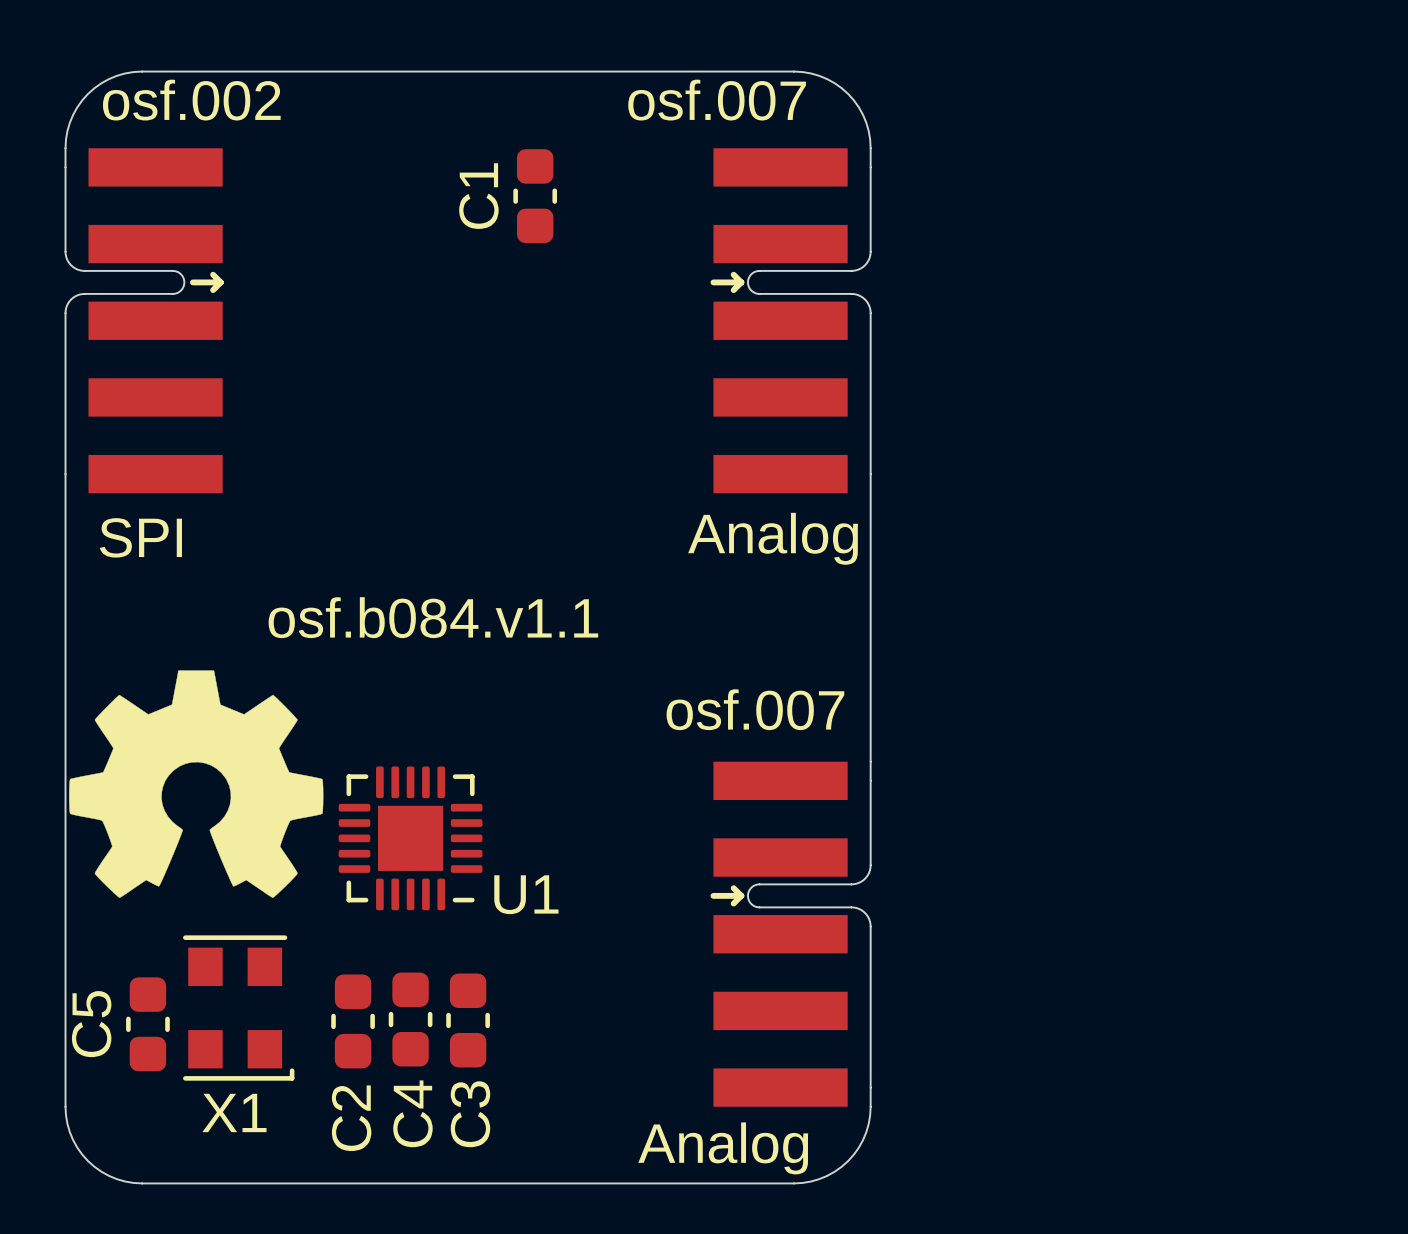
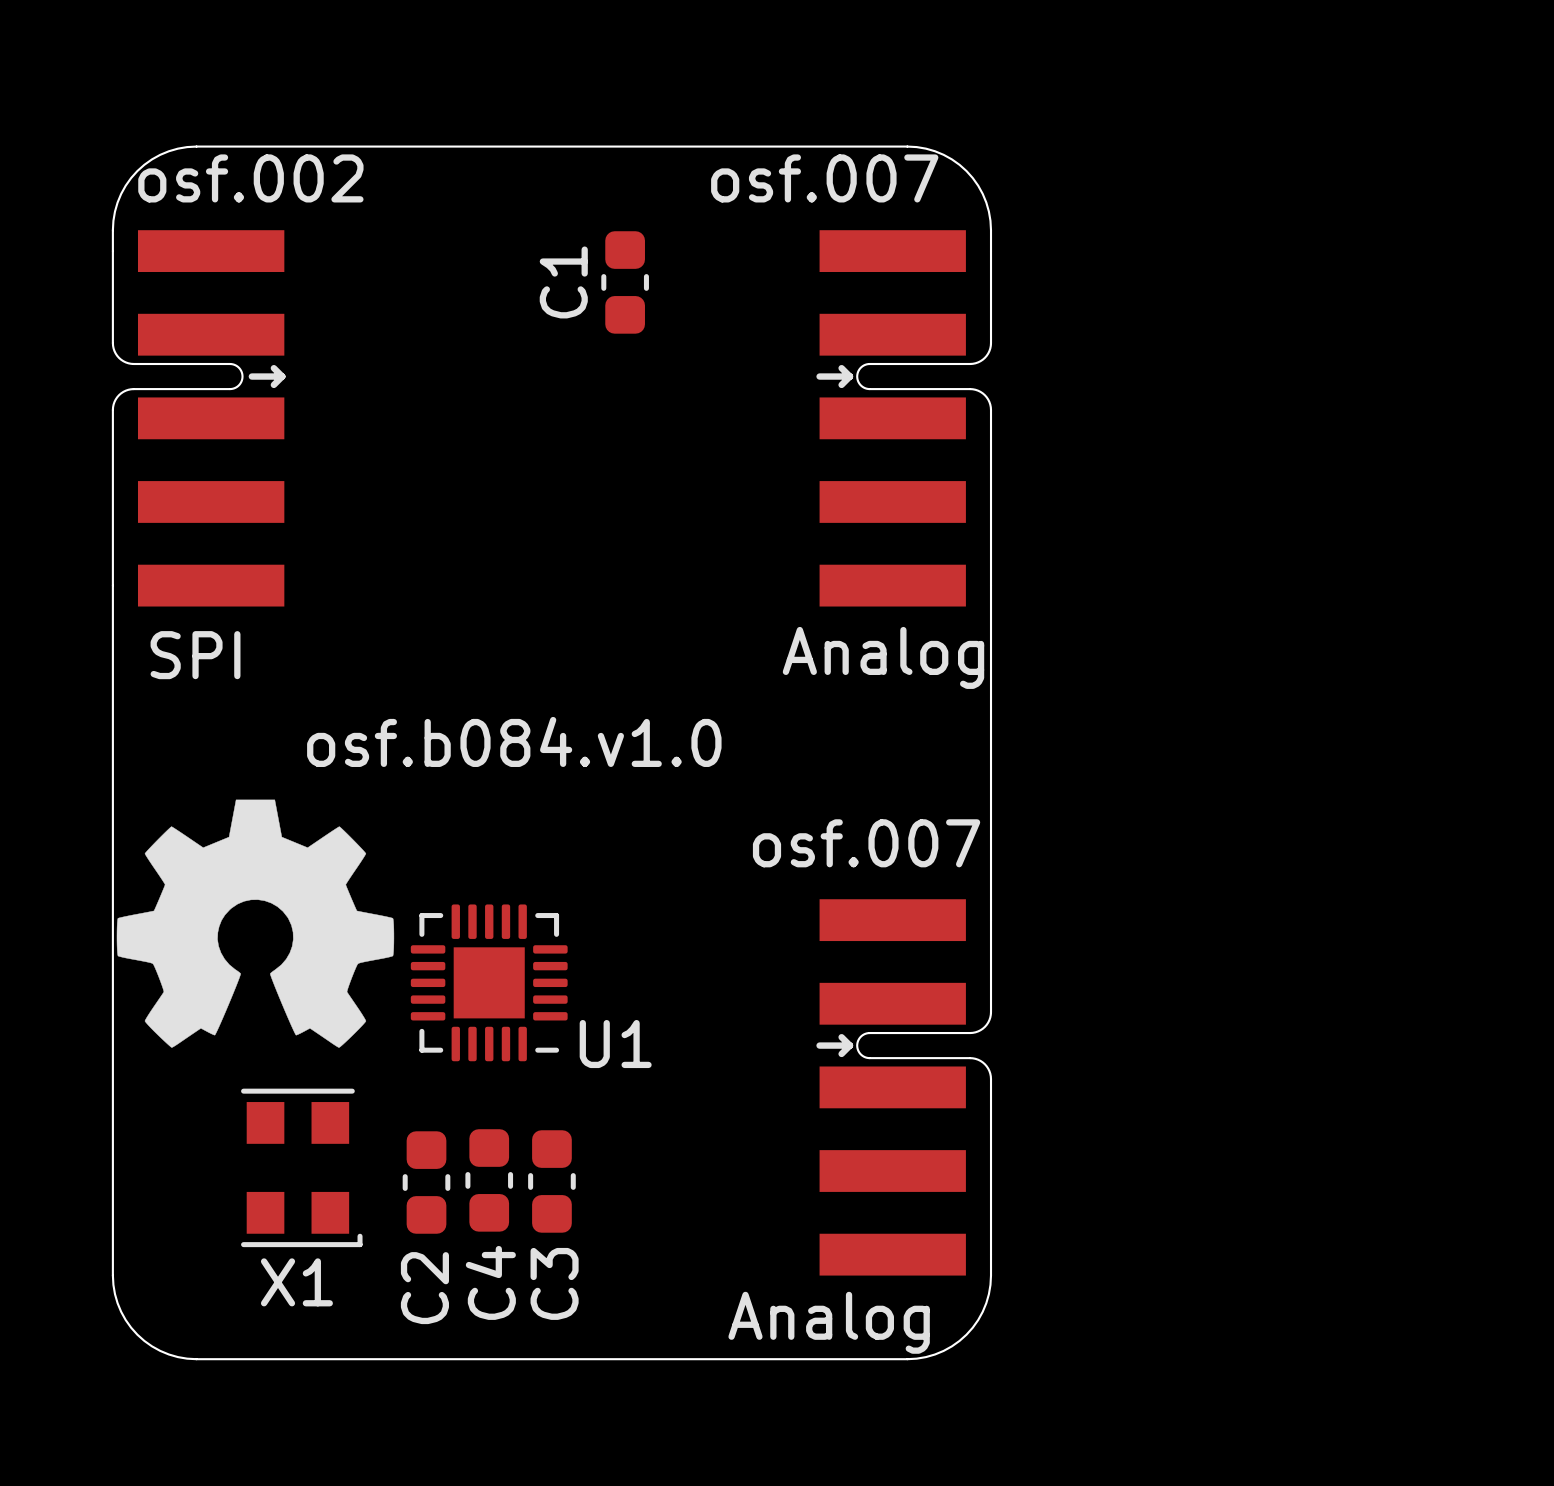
text: osf.b084.v1.1 (433, 617) -> osf.b084.v1.0 (514, 741)
C5: (147, 1024) -> none

